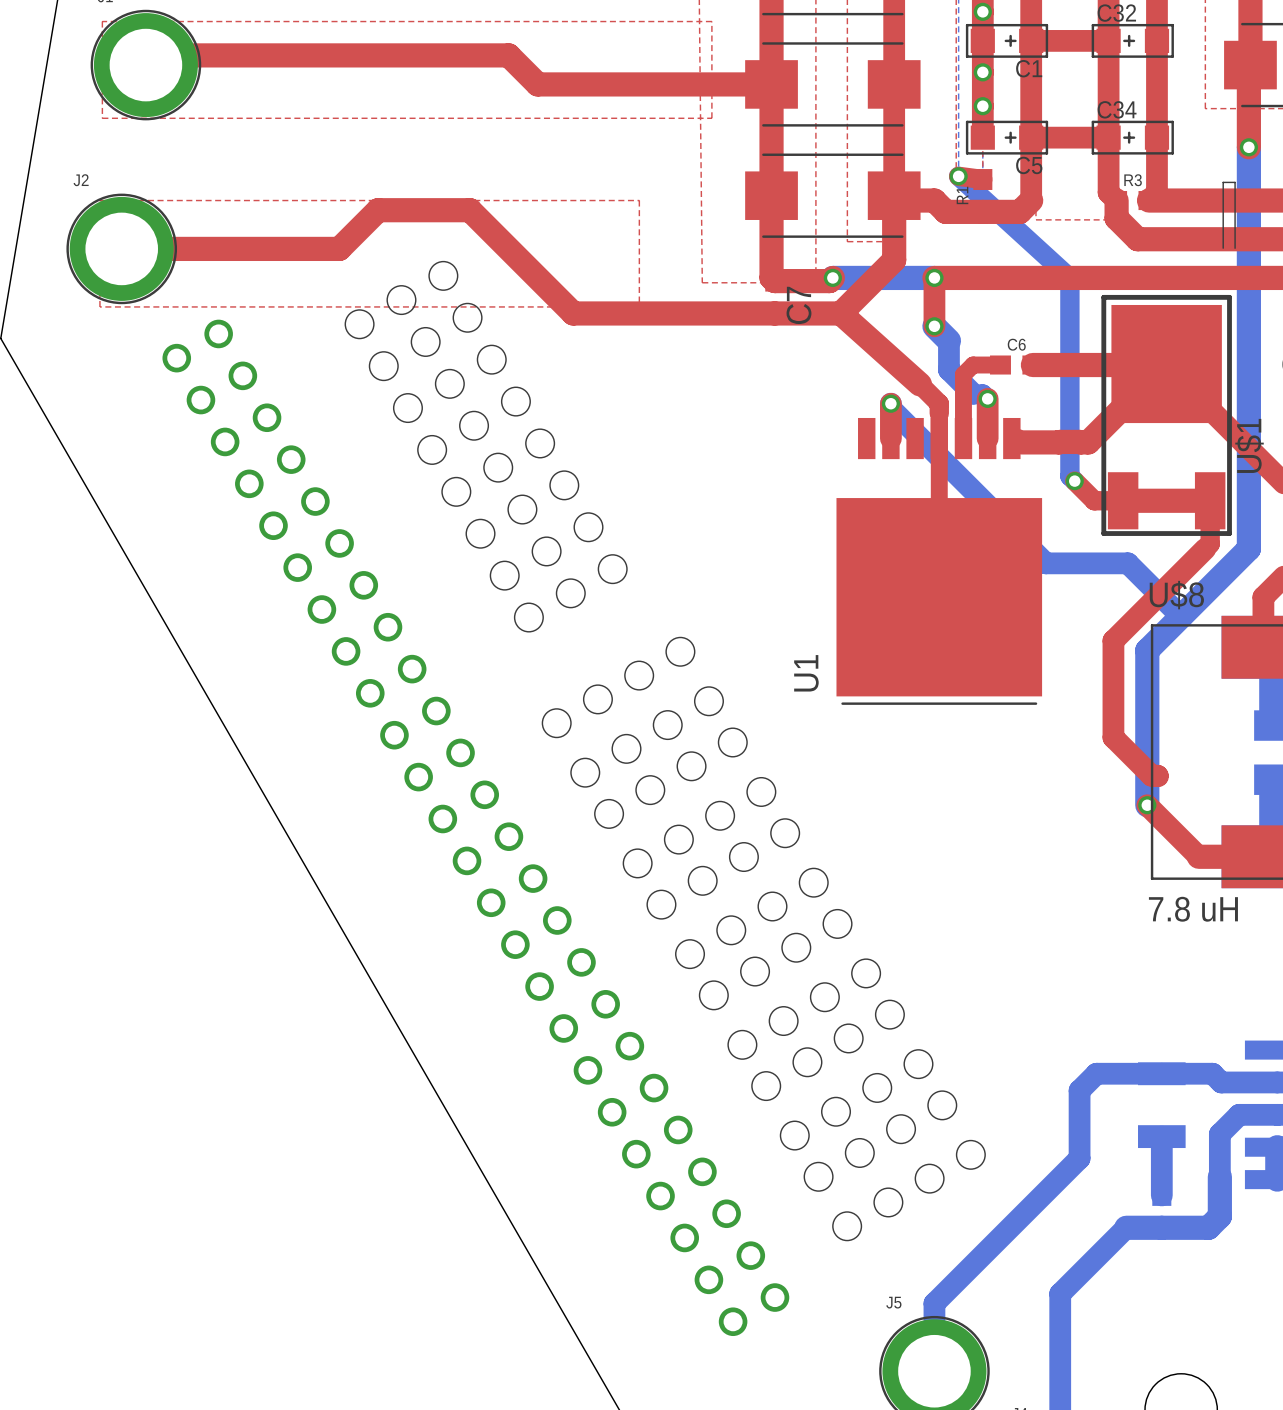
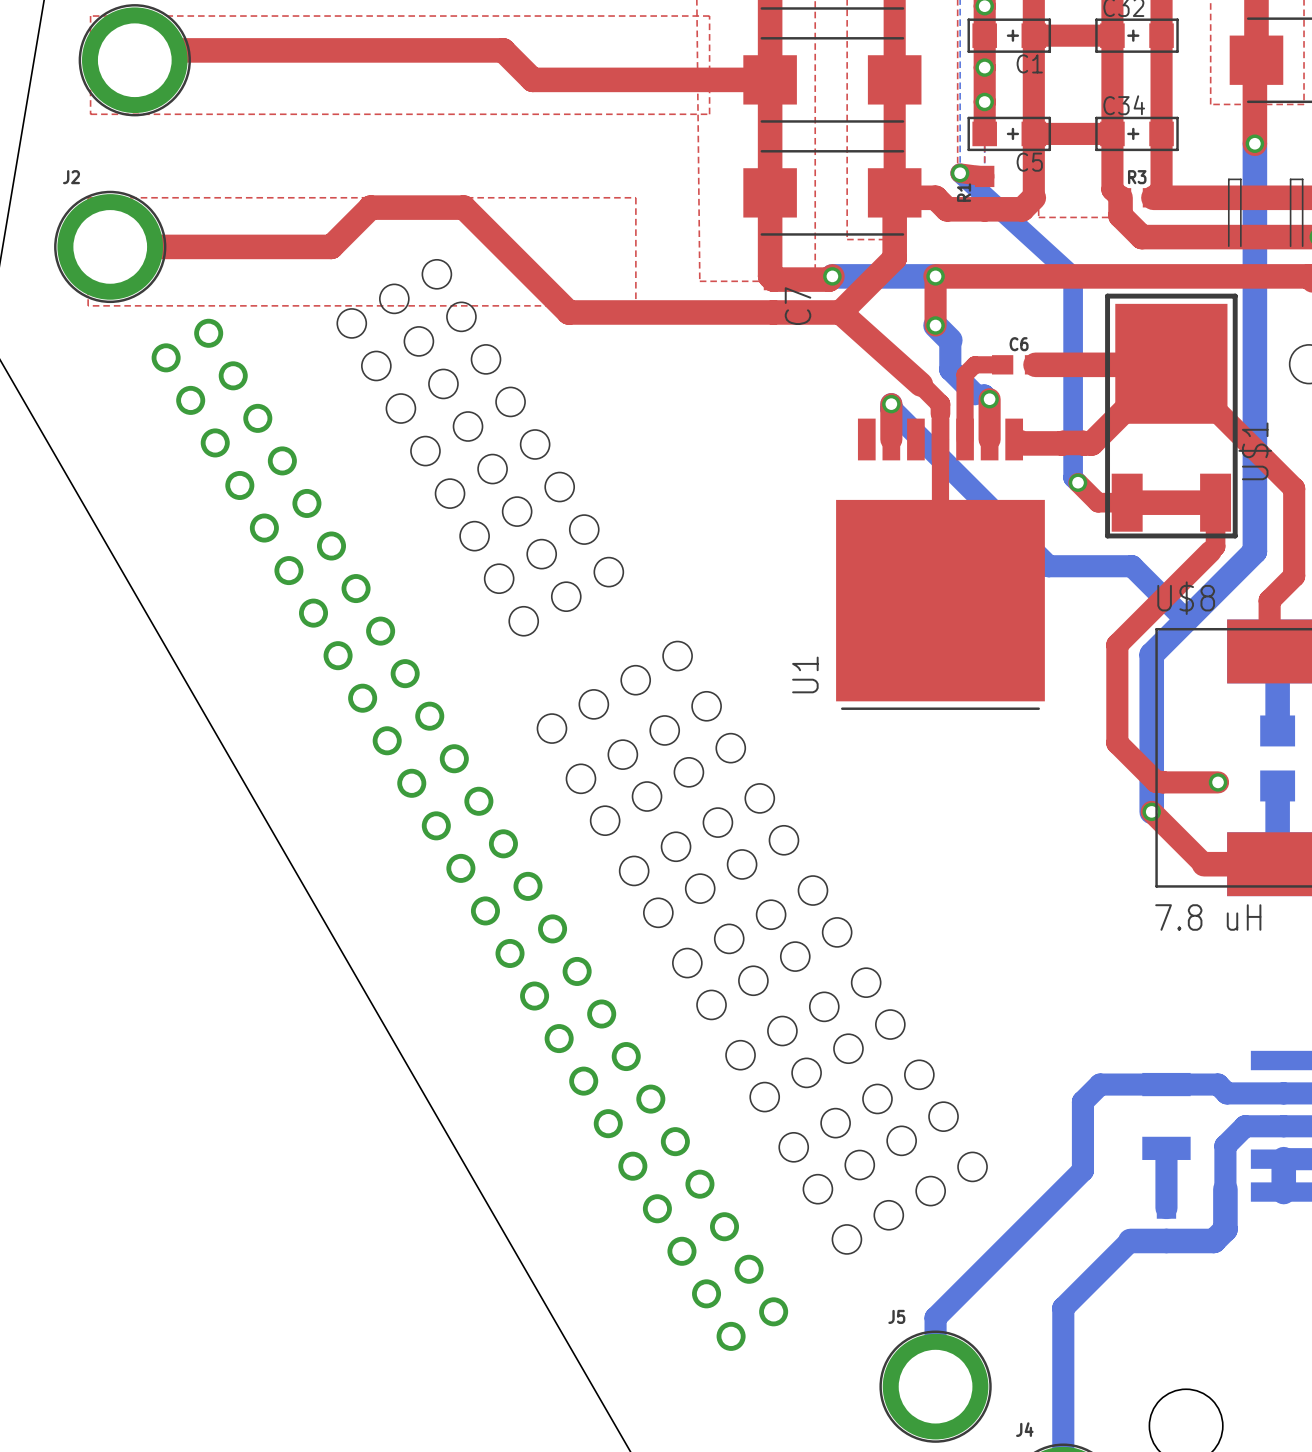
top track: none -> (1162, 782) (1218, 782)
via: none -> (1218, 782)

